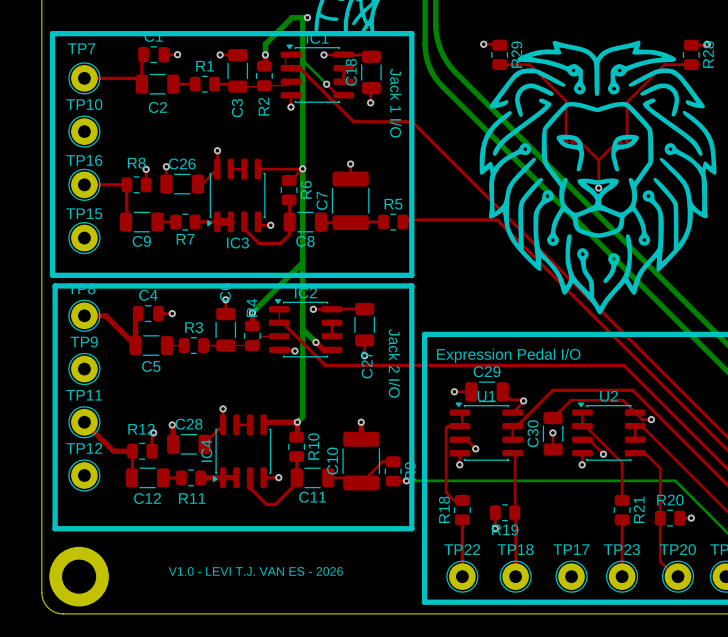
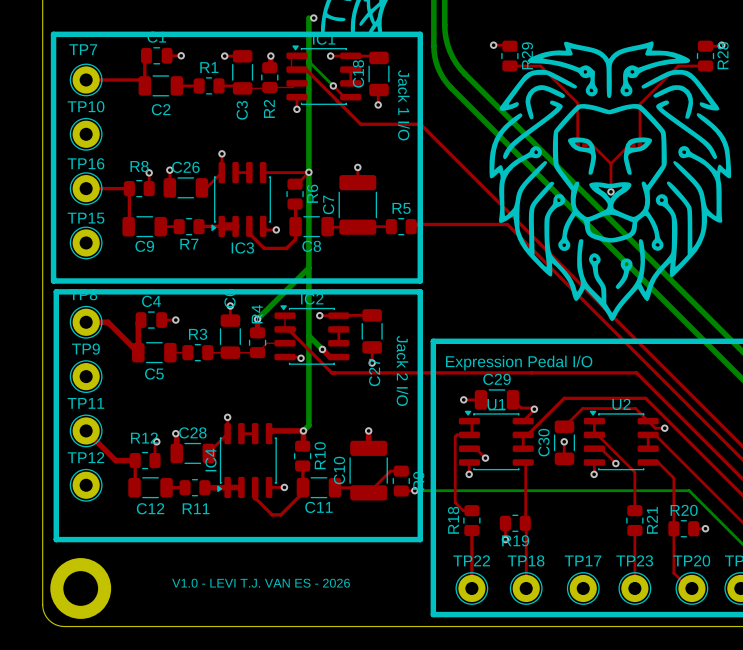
bottom track: (307, 17) (292, 17) (265, 44) (265, 54) -> none

